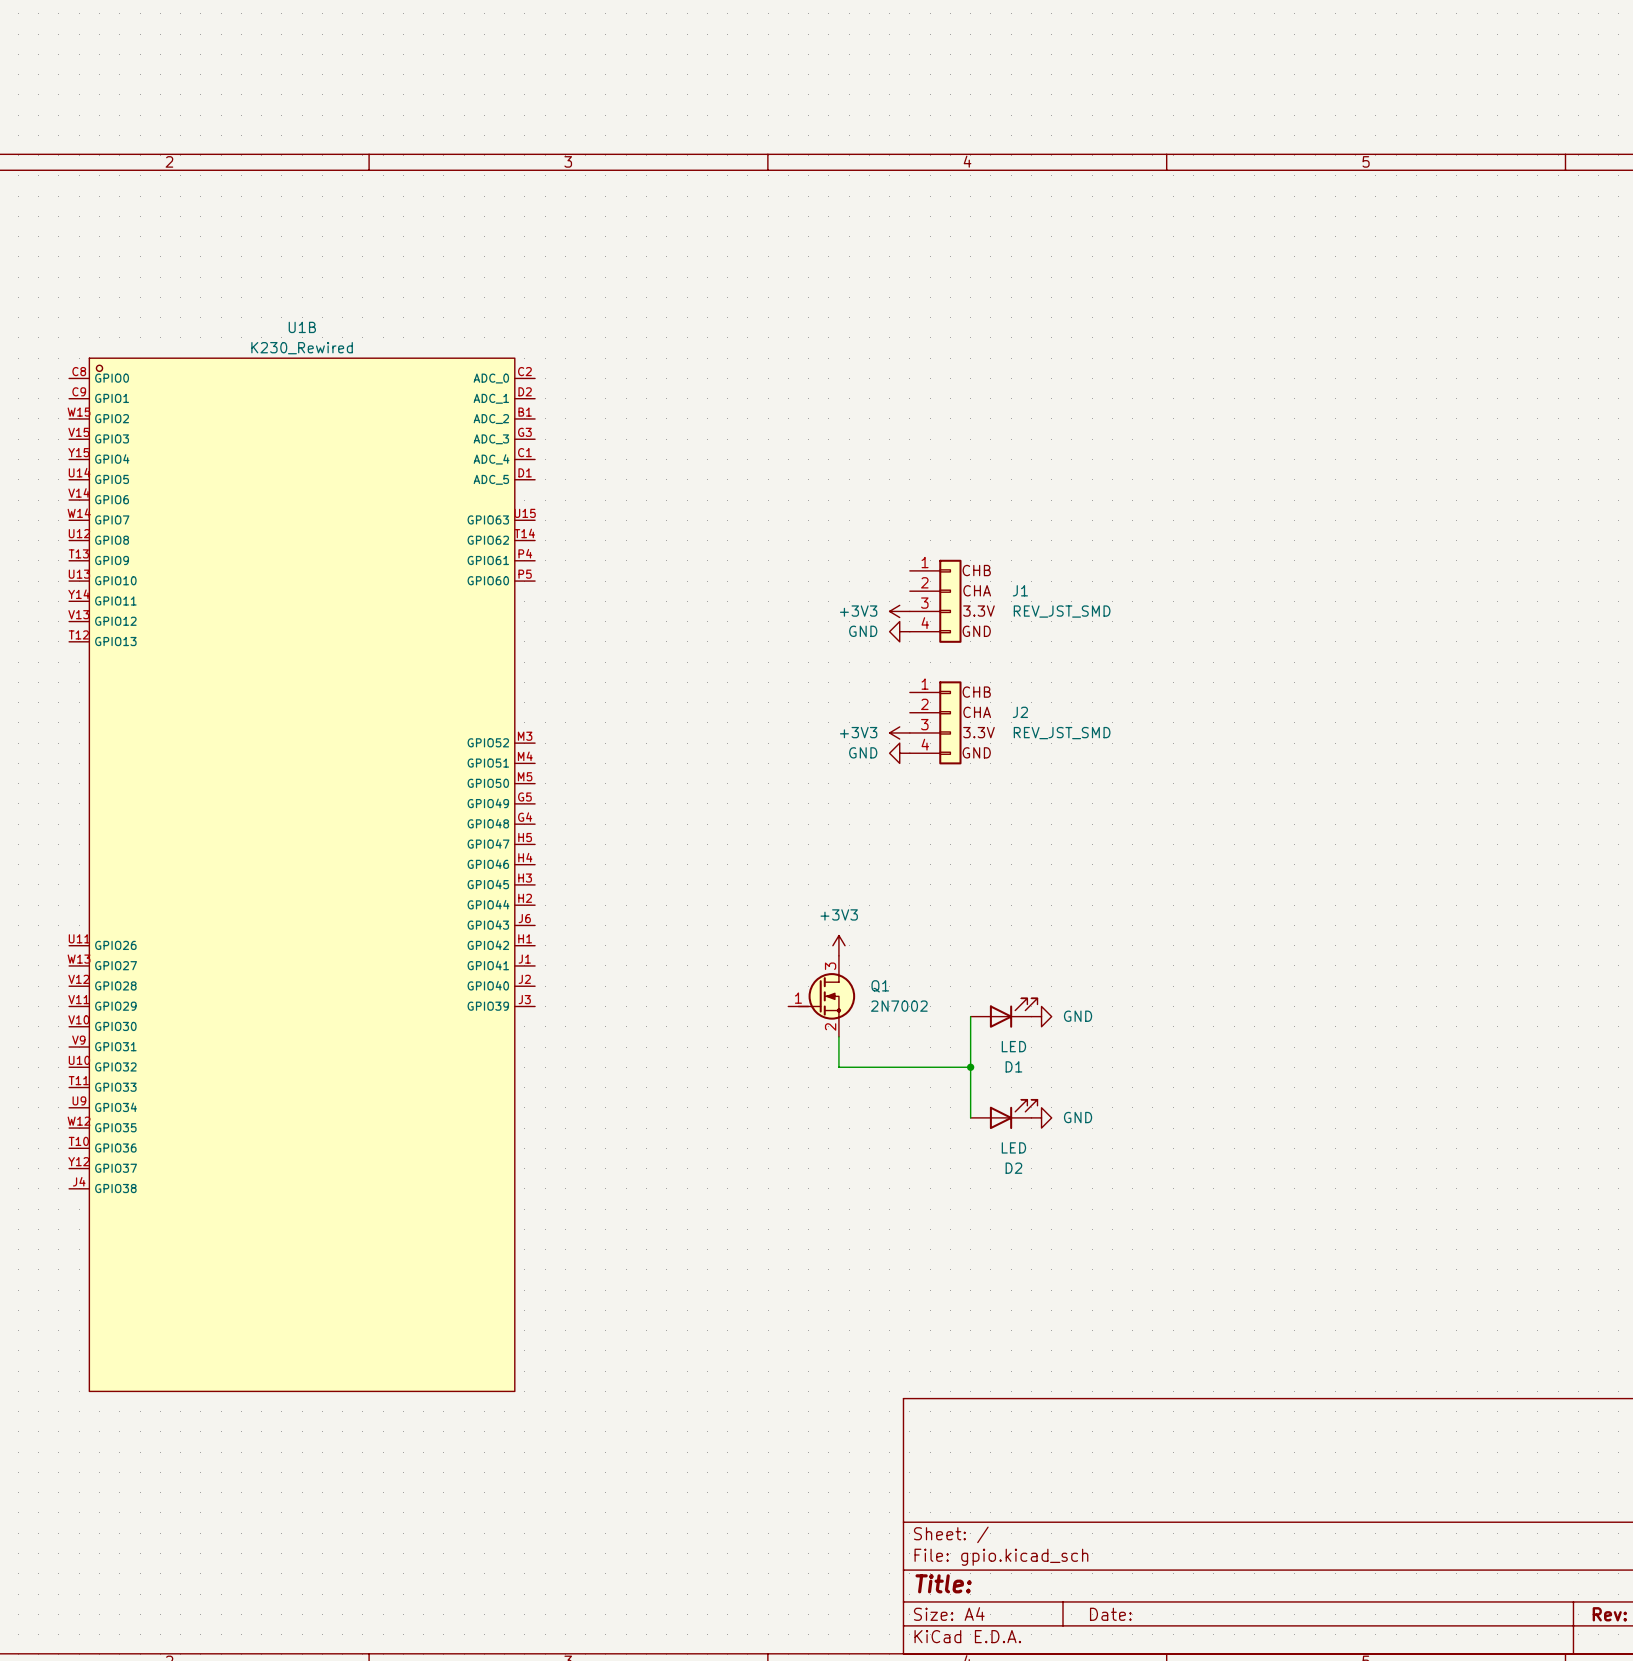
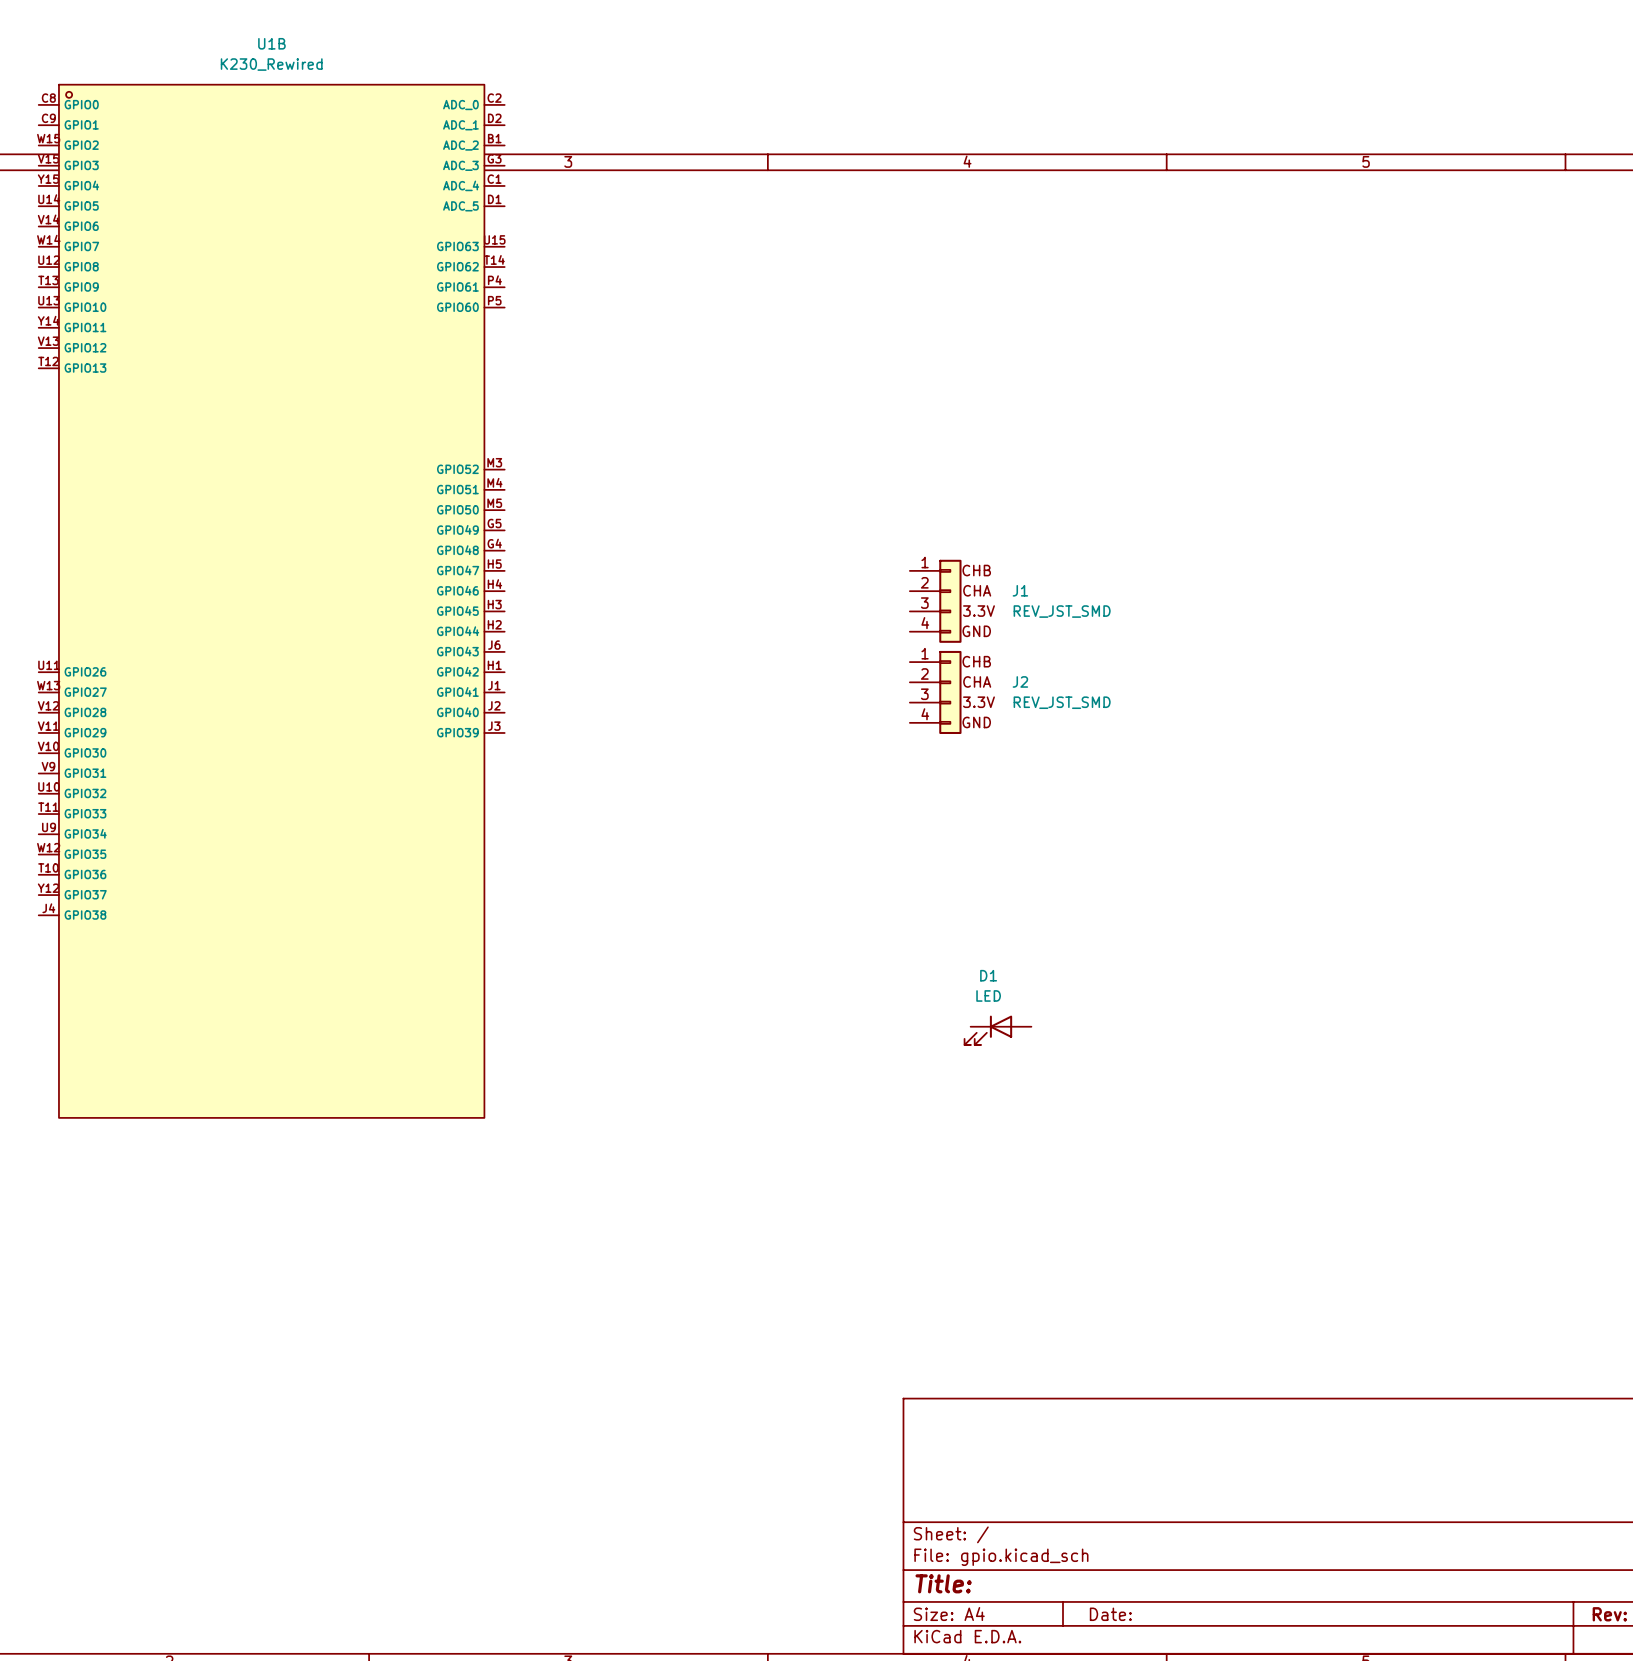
U1B name position: U1B (302, 327) -> U1B (271, 43)
U1B value position: K230_Rewired (302, 348) -> K230_Rewired (271, 64)
power symbol: +3V3 (899, 611) -> none
power symbol: GND (899, 631) -> none
J2 position: (935, 722) -> (935, 692)
power symbol: +3V3 (899, 732) -> none
power symbol: GND (899, 753) -> none
U1B position: (302, 874) -> (271, 601)
power symbol: +3V3 (838, 945) -> none
Q1: 2N7002 (821, 996) -> none
D1 rotation: 0° (1013, 1013) -> 180° (988, 1030)
wire: (970, 1016) (970, 1117) -> none
power symbol: GND (1041, 1016) -> none
wire: (838, 1036) (838, 1067) (970, 1067) -> none
junction: (970, 1067) -> none
D2: LED (1004, 1114) -> none
power symbol: GND (1041, 1117) -> none

